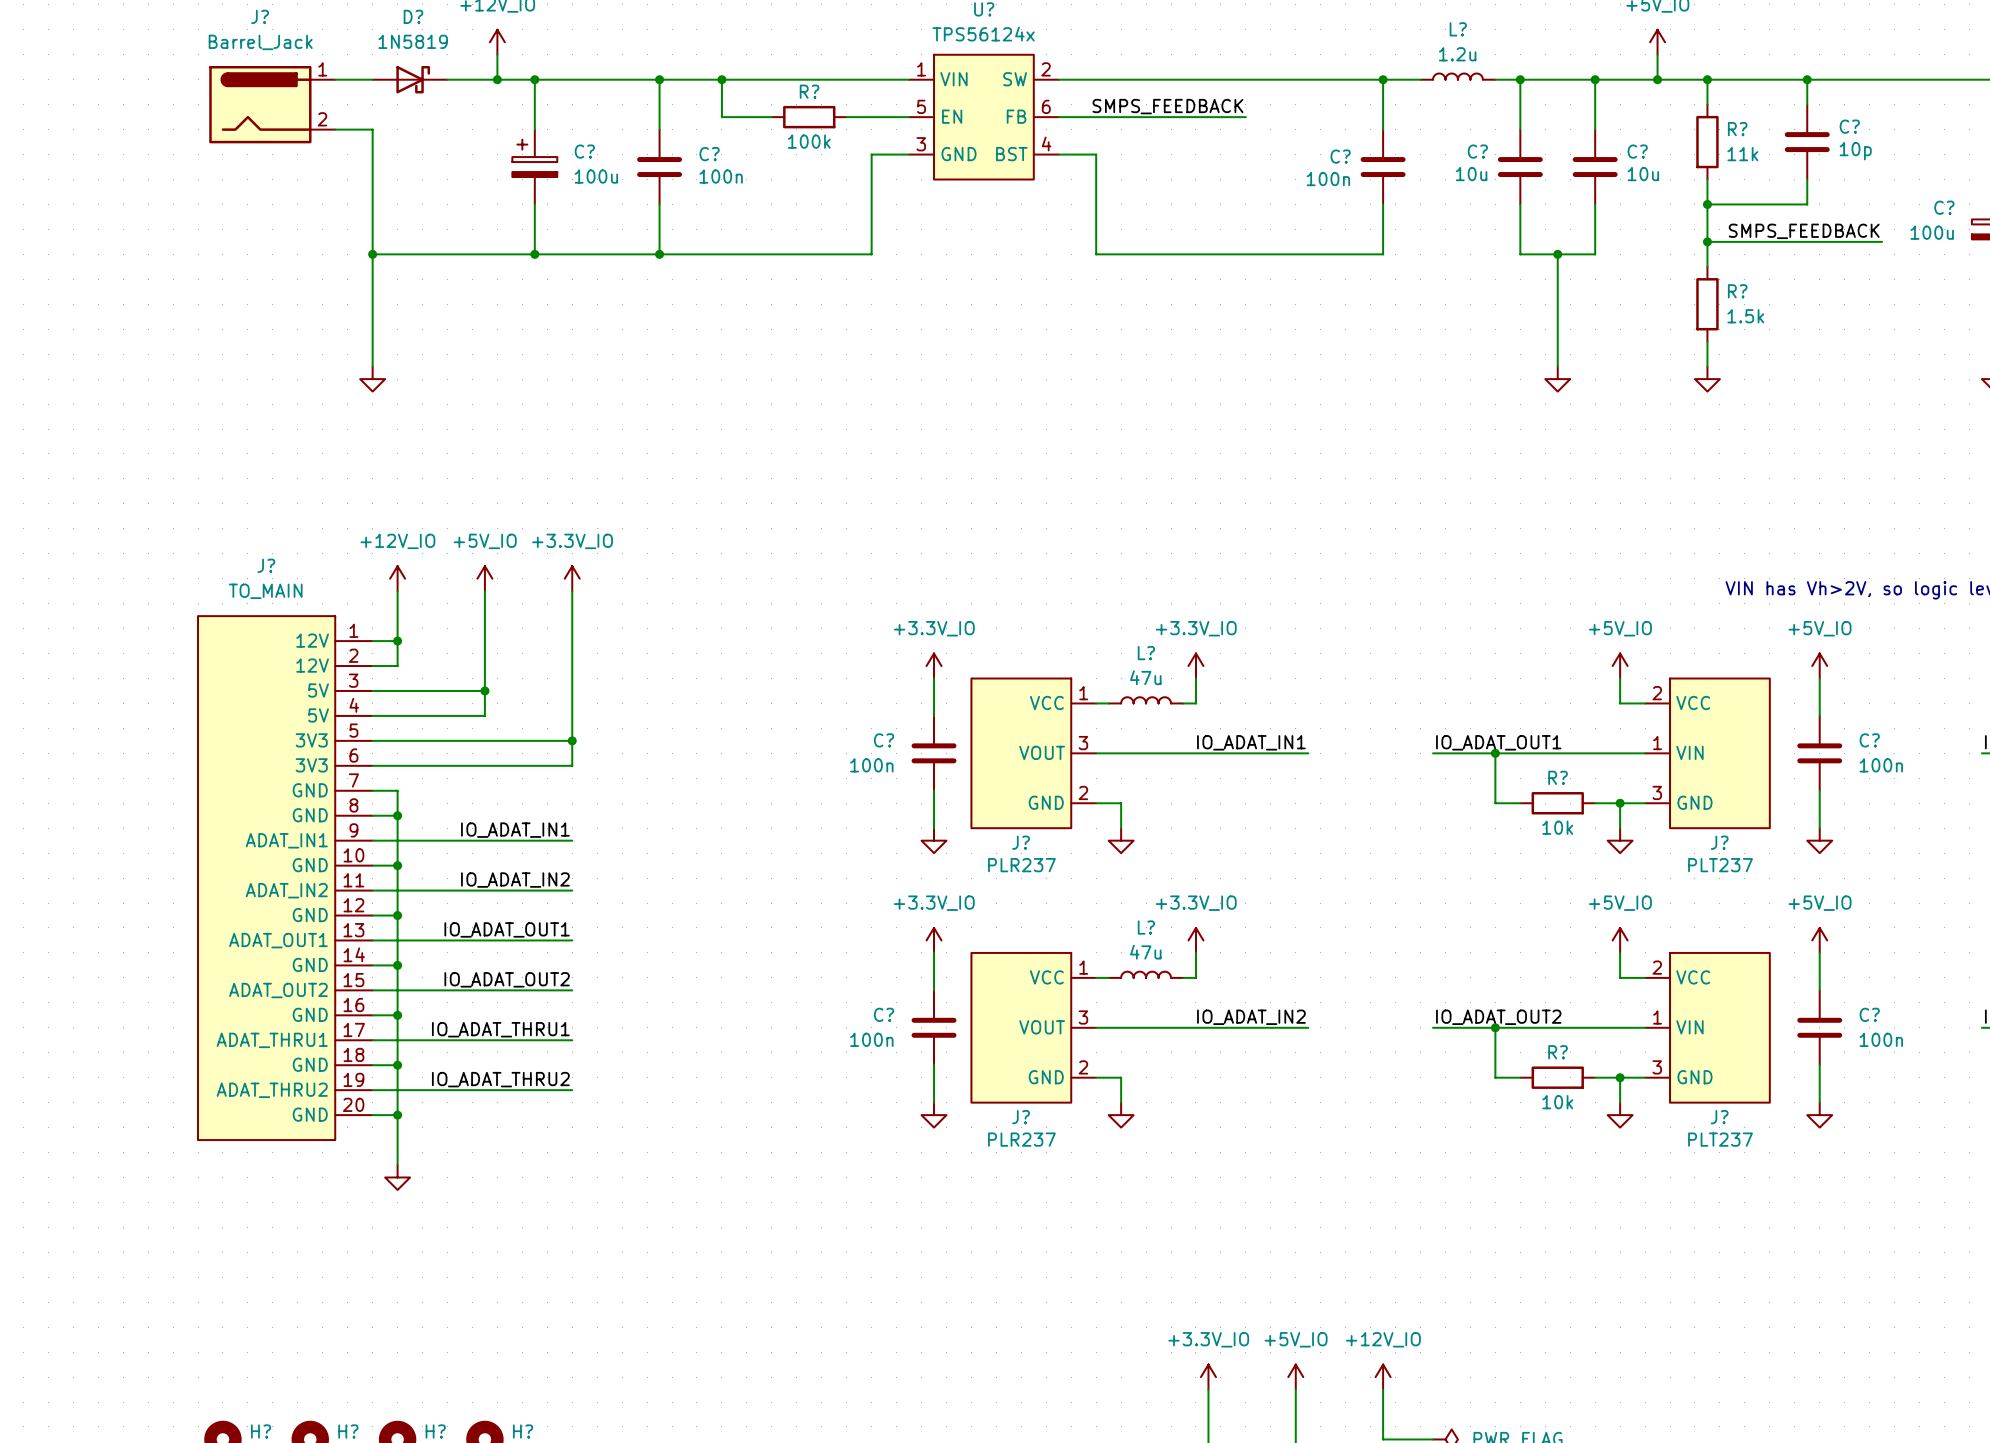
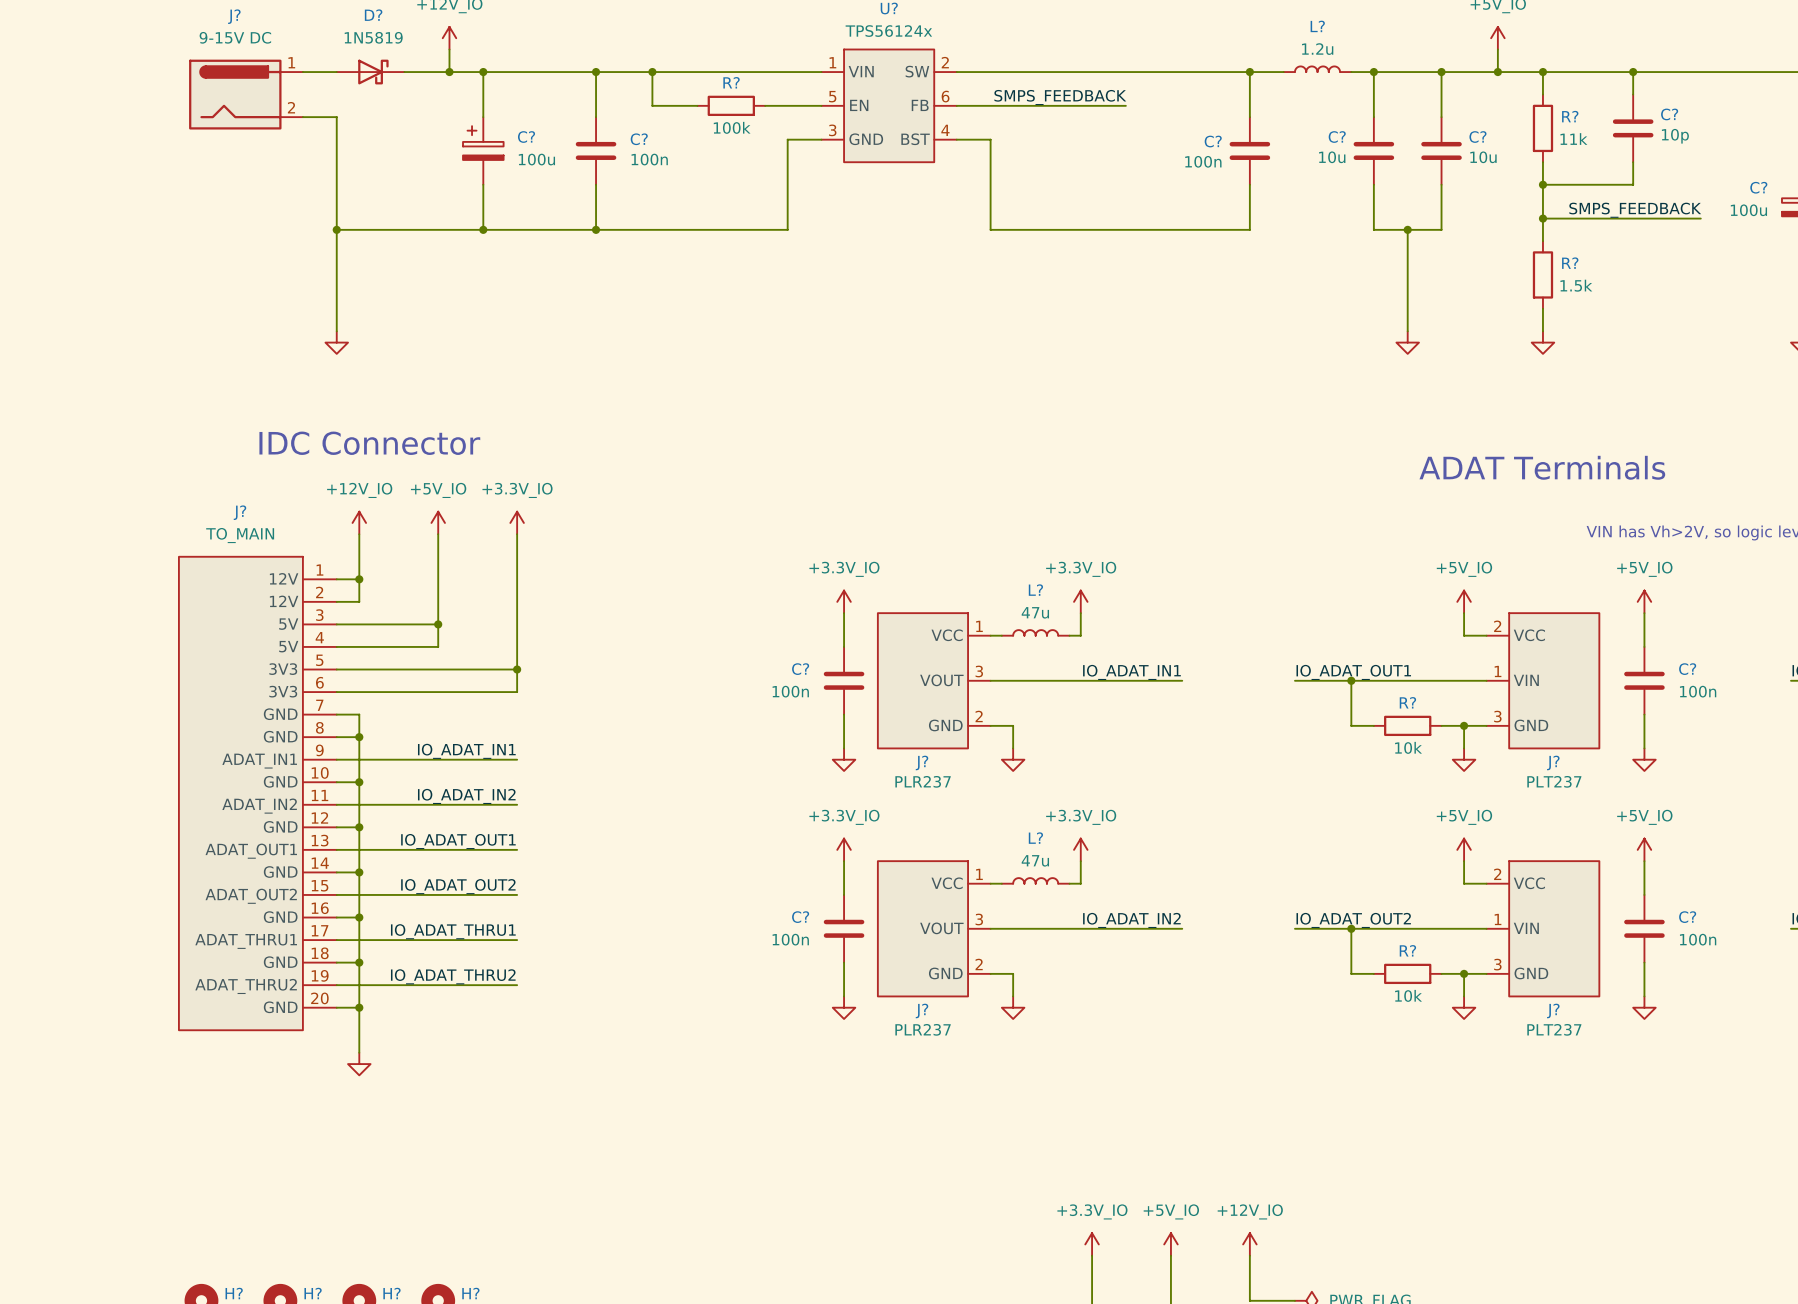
J? value: Barrel_Jack (260, 42) -> 9-15V DC (235, 37)
text: none -> IDC Connector (369, 443)
text: none -> ADAT Terminals (1542, 467)

